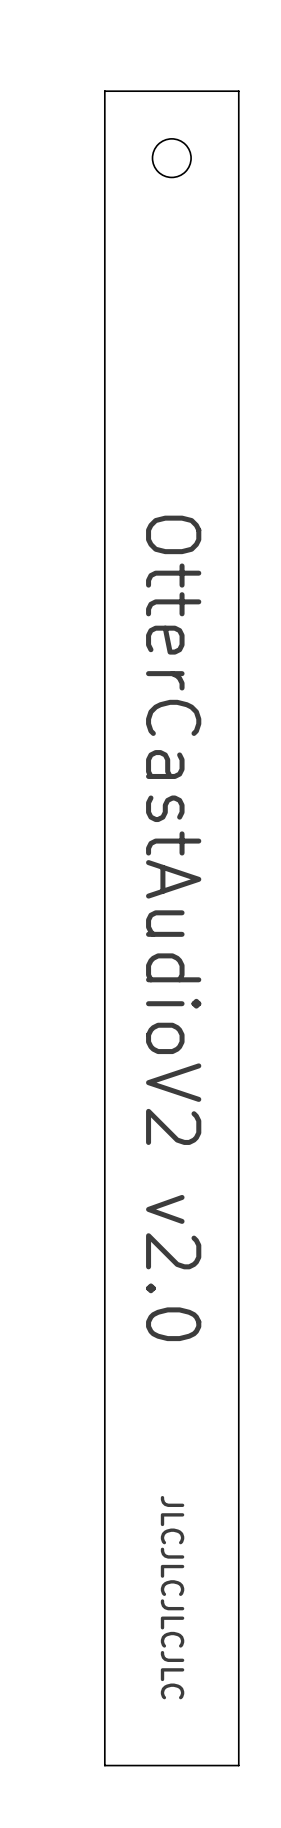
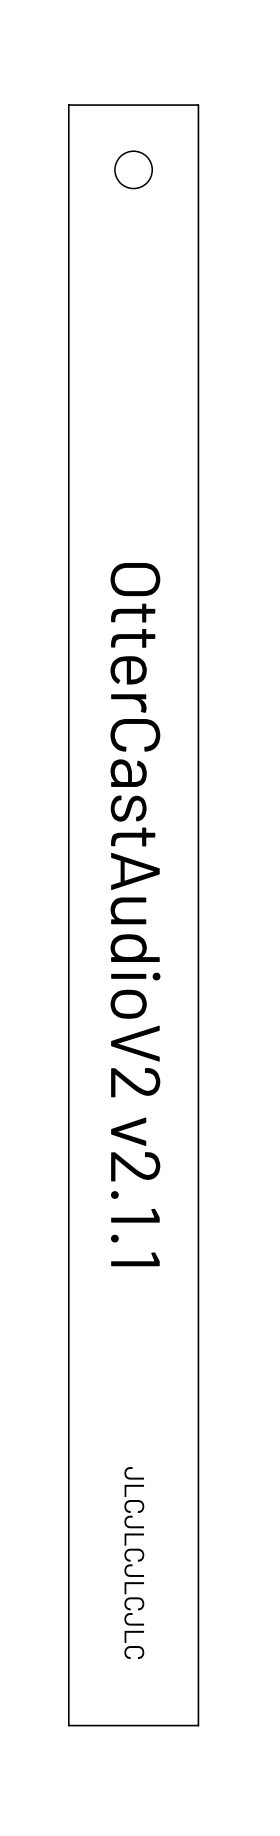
text: OtterCastAudioV2 v2.0 (173, 928) -> OtterCastAudioV2 v2.1.1 (135, 914)

